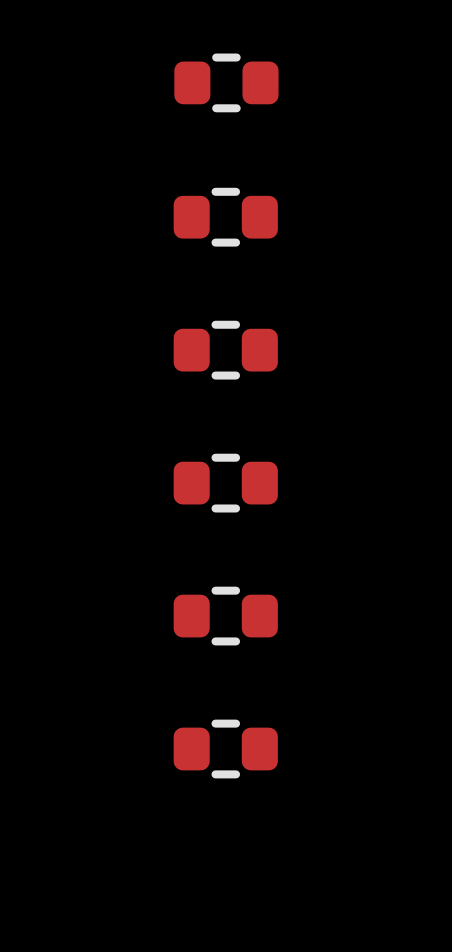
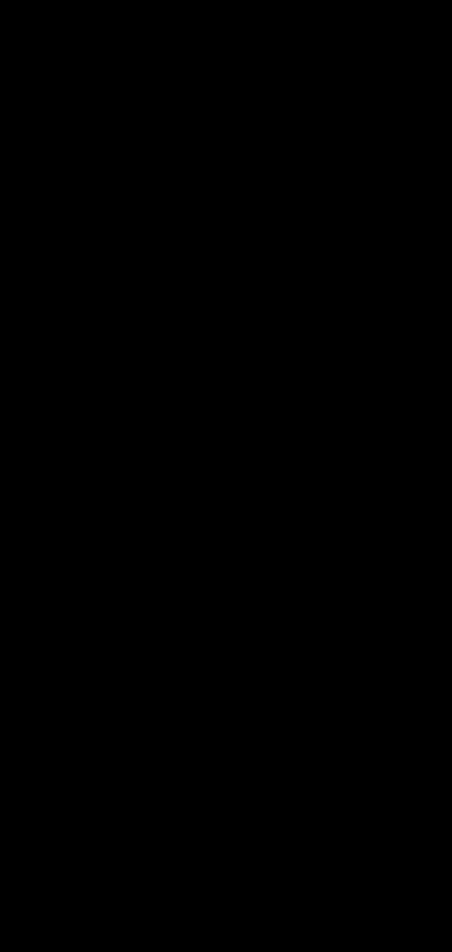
part: (226, 82) -> none
part: (225, 217) -> none
part: (225, 350) -> none
part: (225, 483) -> none
part: (225, 616) -> none
part: (225, 749) -> none

